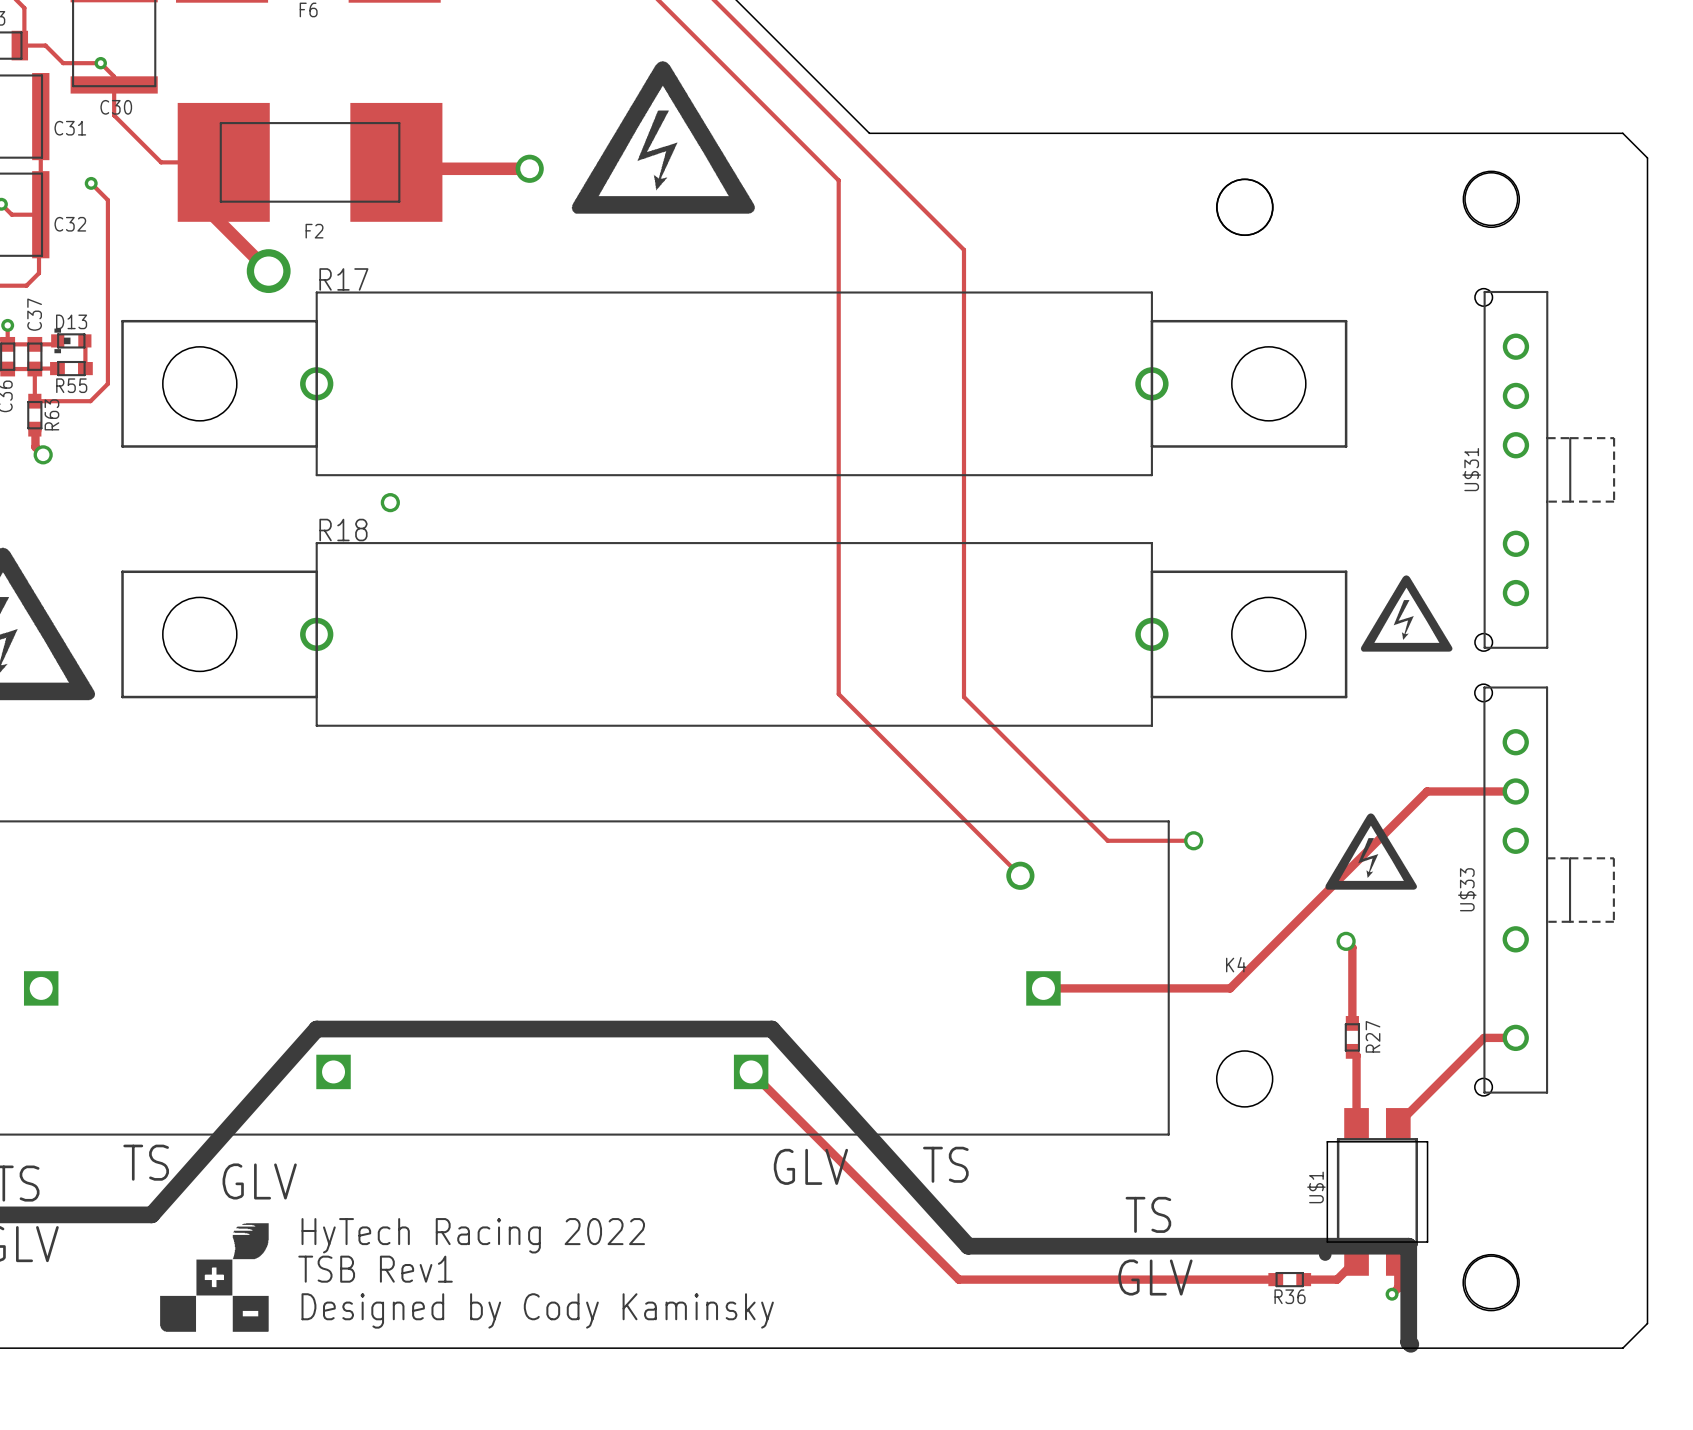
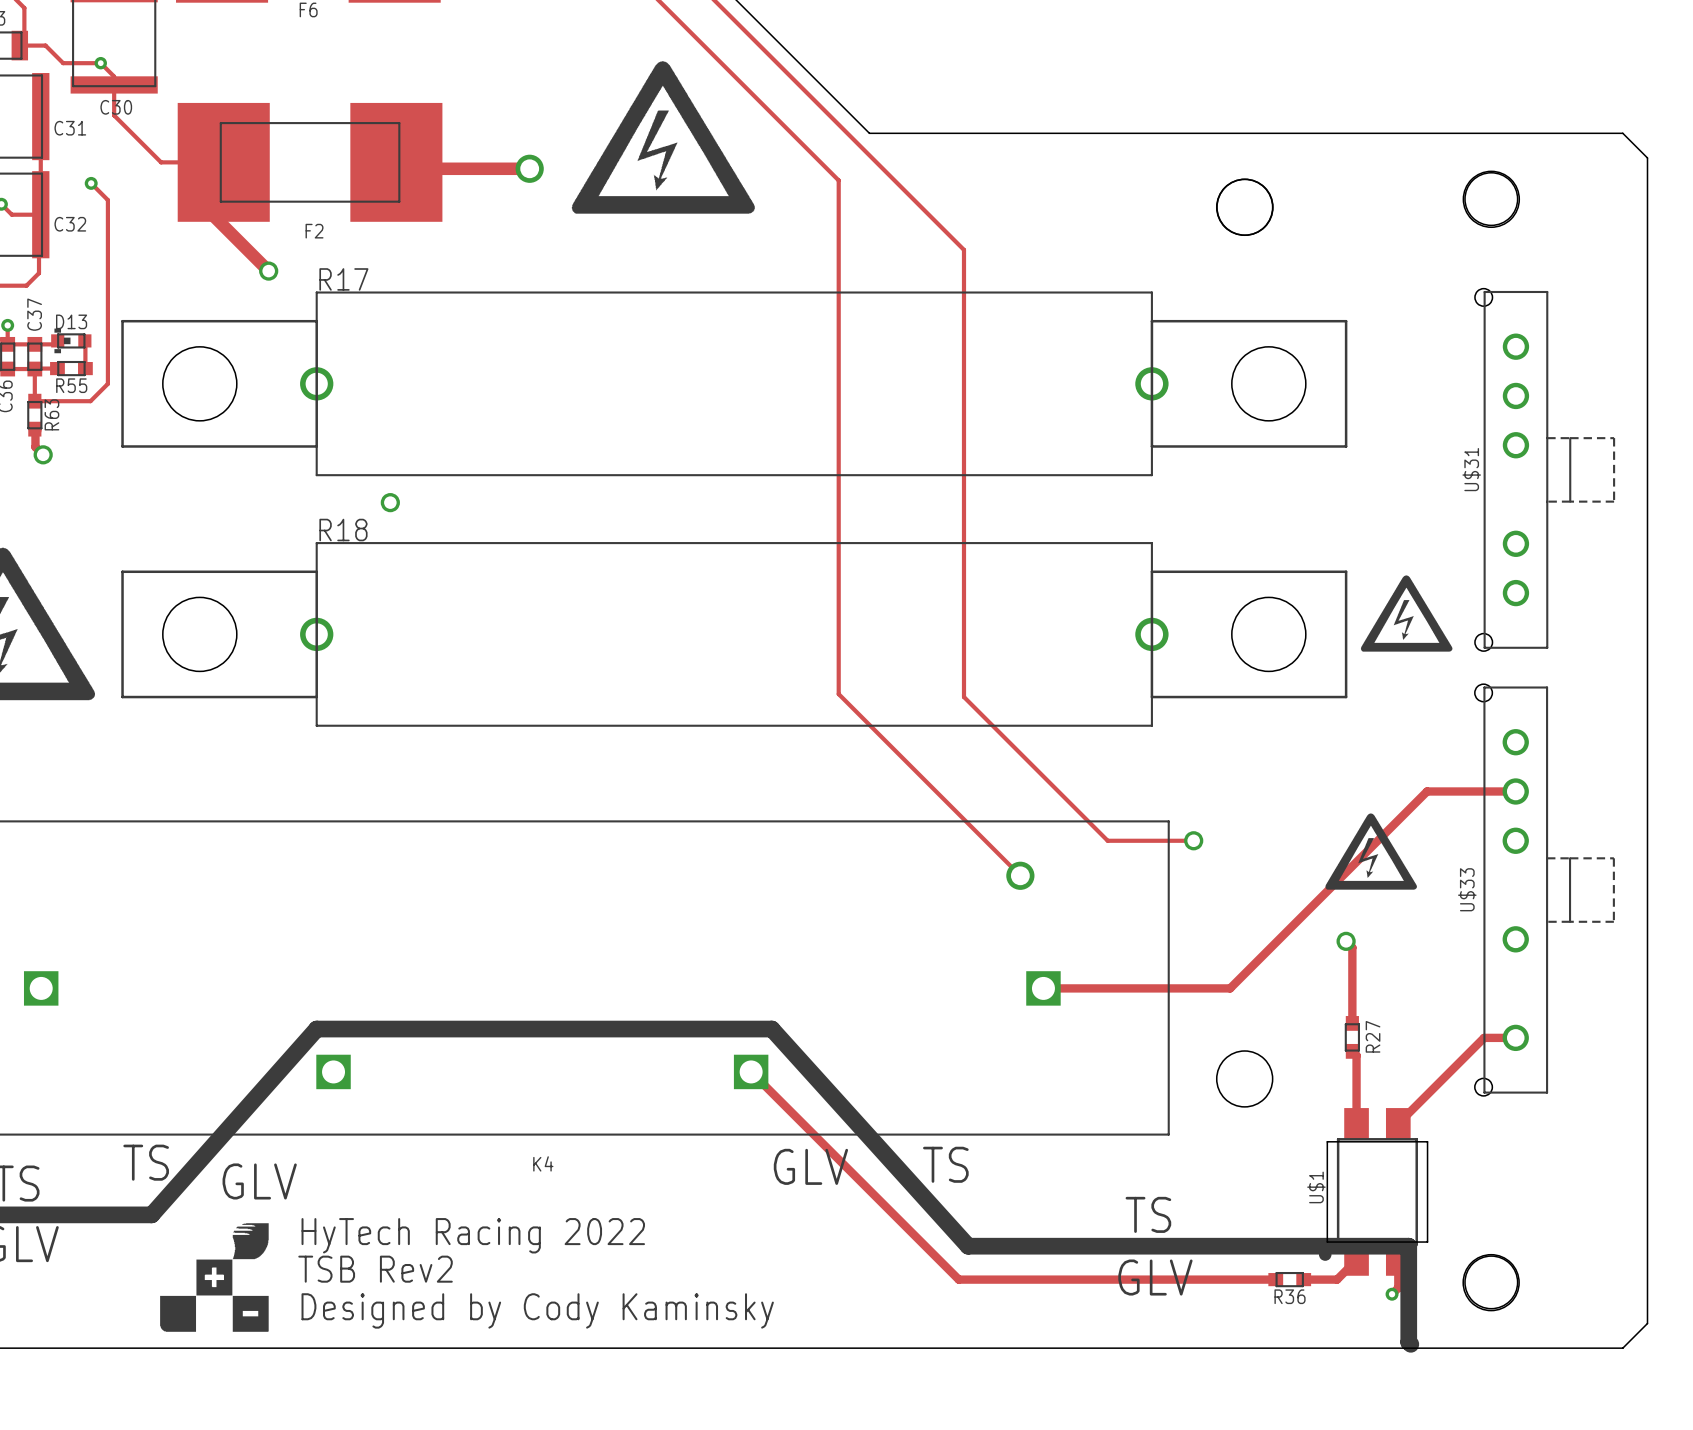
via size: [246, 249, 291, 294] -> [259, 261, 279, 281]
K4 name position: K4 (1236, 964) -> K4 (543, 1163)
text: TSB Rev1 (375, 1269) -> TSB Rev2 (375, 1269)

